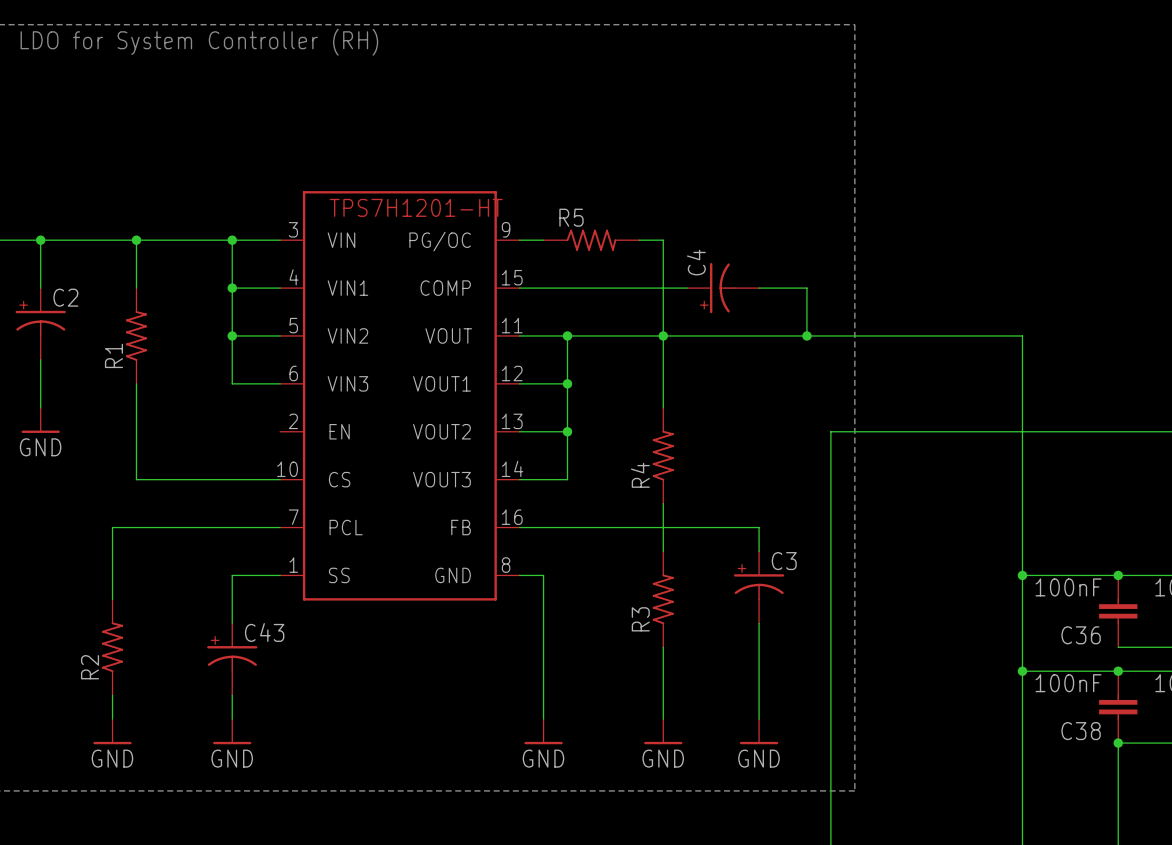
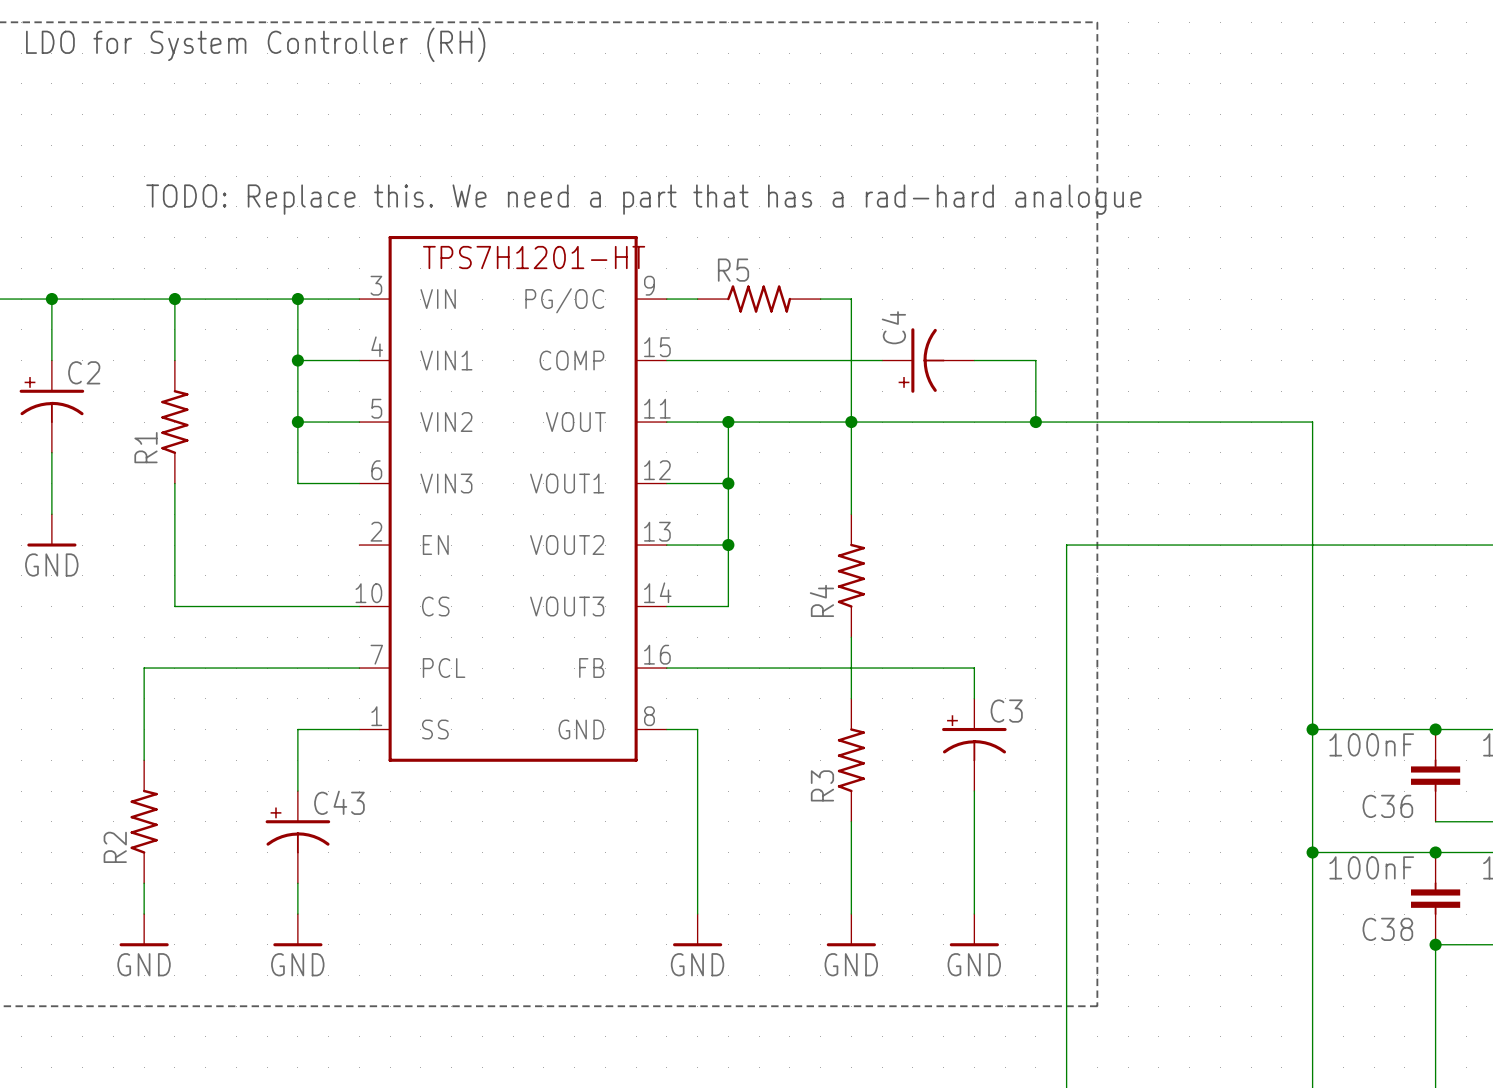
text: none -> TODO: Replace this. We need a part that has a rad-hard analogue (643, 199)

